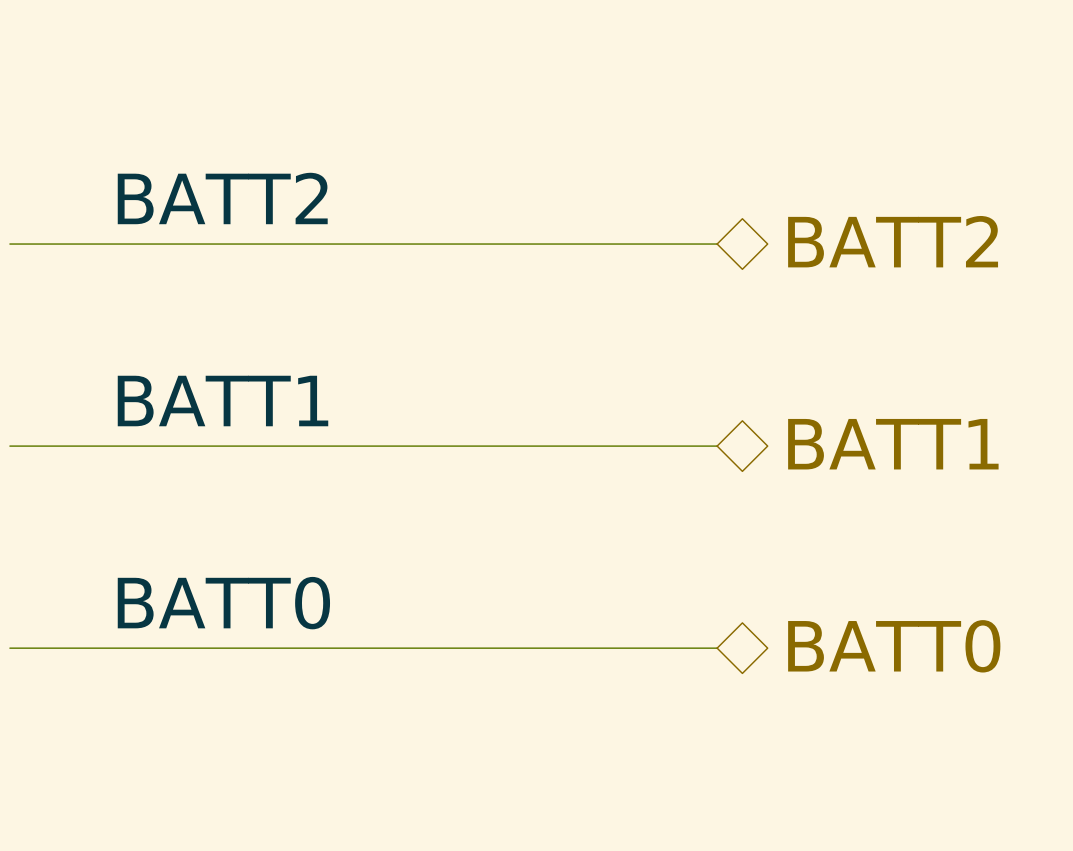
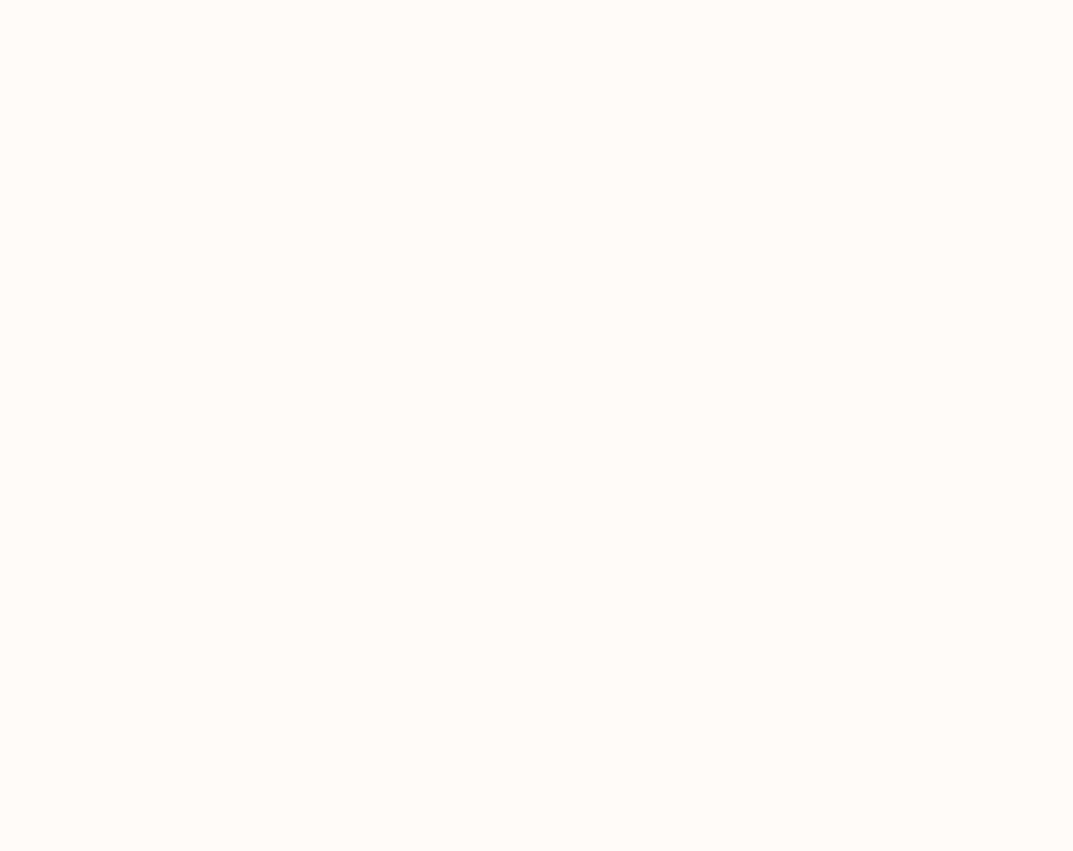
label: BATT2 (222, 198) -> none
hierarchical label: BATT2 (893, 241) -> none
wire: (9, 244) (717, 244) -> none
label: BATT1 (222, 401) -> none
hierarchical label: BATT1 (893, 444) -> none
wire: (9, 446) (717, 446) -> none
label: BATT0 (223, 603) -> none
hierarchical label: BATT0 (894, 646) -> none
wire: (9, 648) (717, 648) -> none

